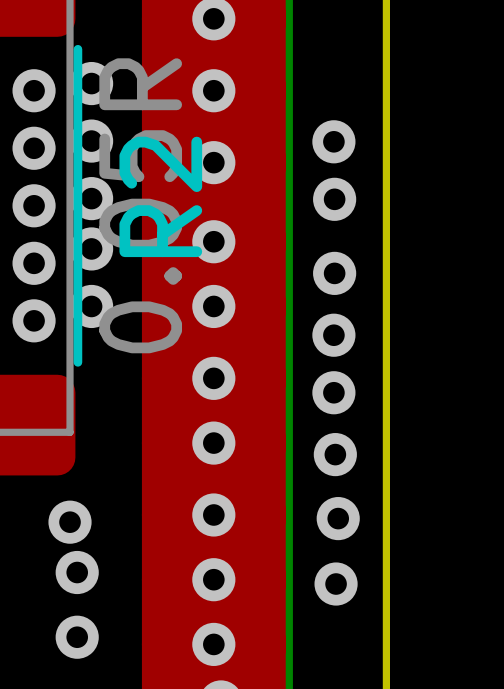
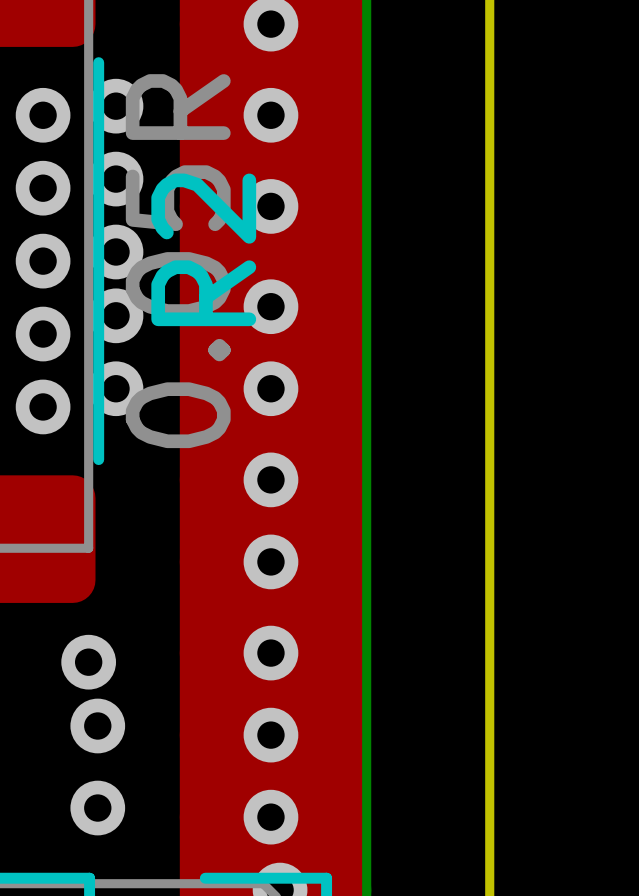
via: (333, 141) -> none
via: (334, 199) -> none
via: (334, 273) -> none
via: (333, 335) -> none
via: (333, 392) -> none
via: (335, 454) -> none
via: (338, 518) -> none
via: (336, 584) -> none

